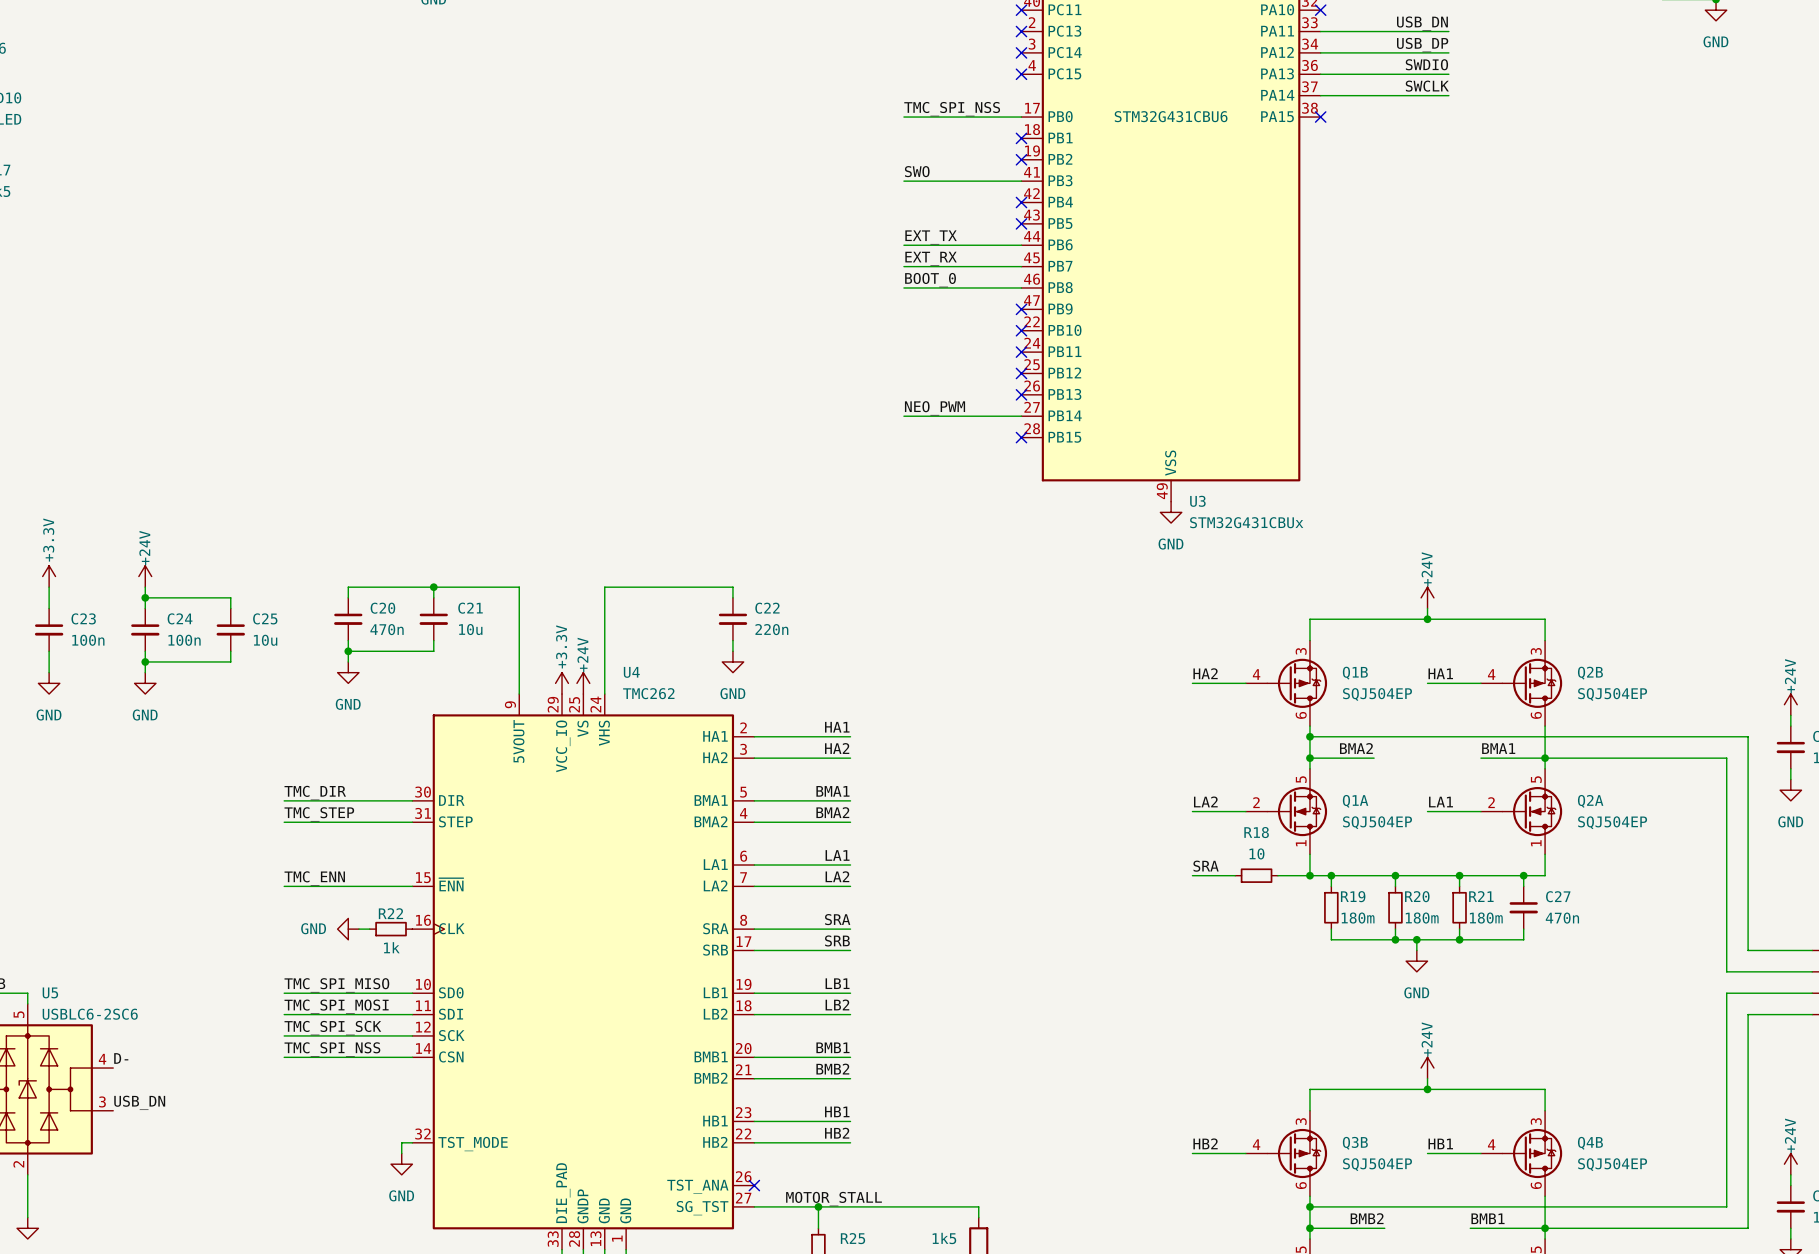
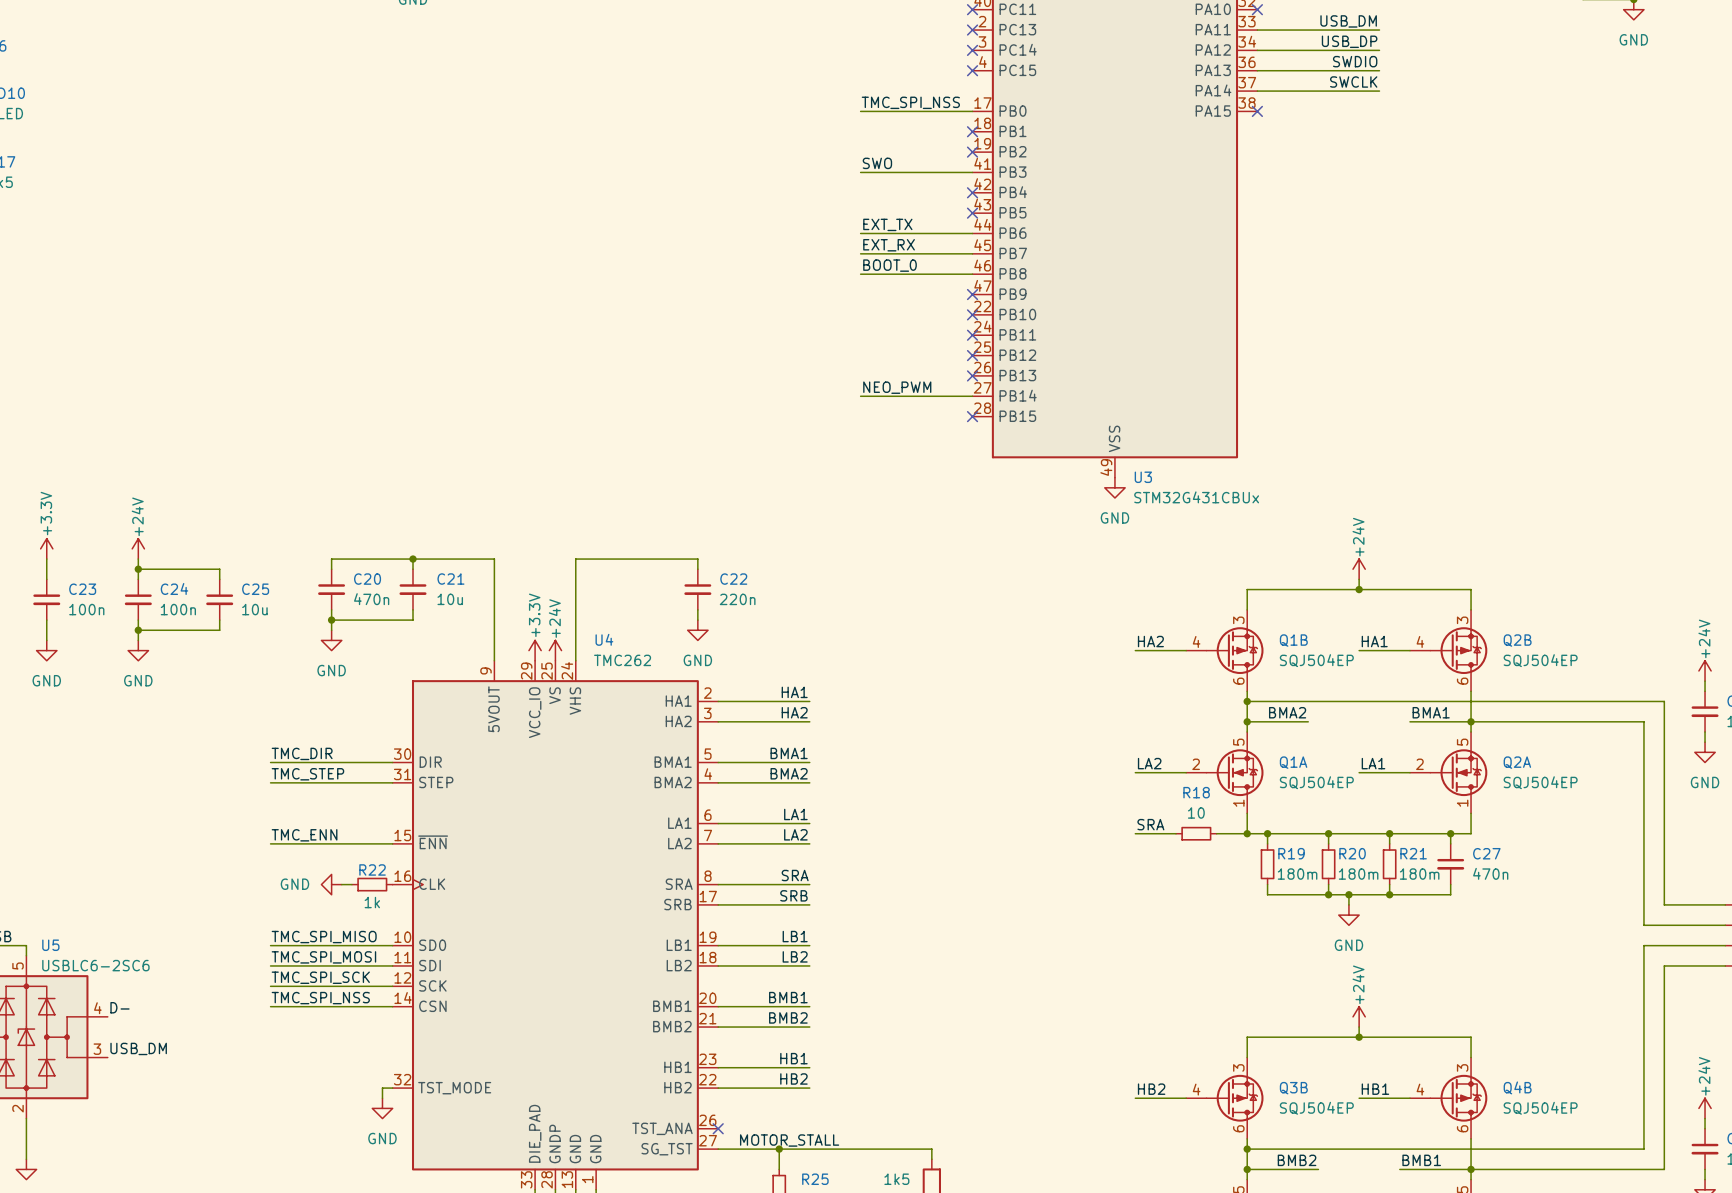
label: USB_DN (1422, 23) -> USB_DM (1348, 21)
U3 text: STM32G431CBU6 (1171, 116) -> none
label: USB_DN (139, 1102) -> USB_DM (138, 1048)

